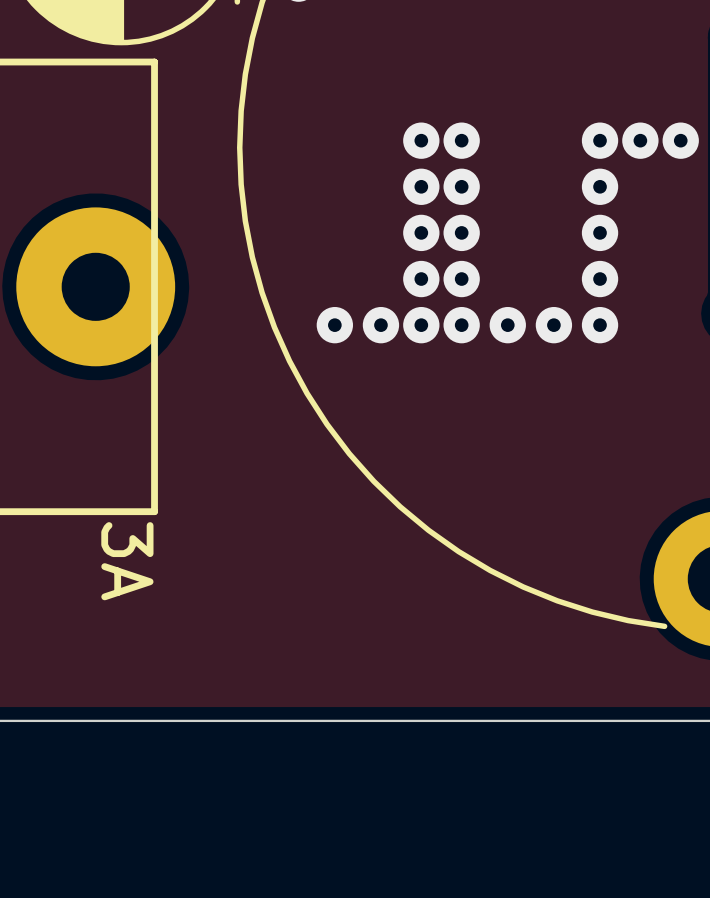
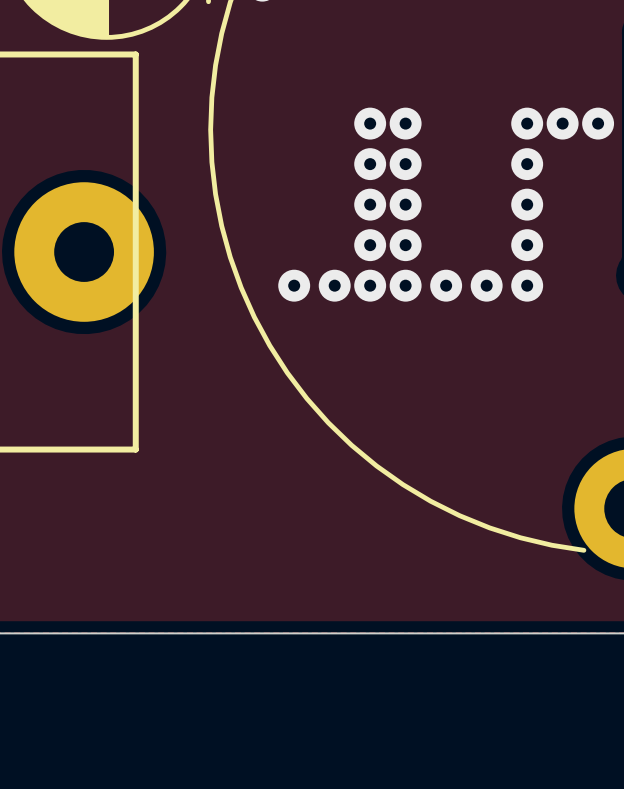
text: 3A (127, 561) -> none

